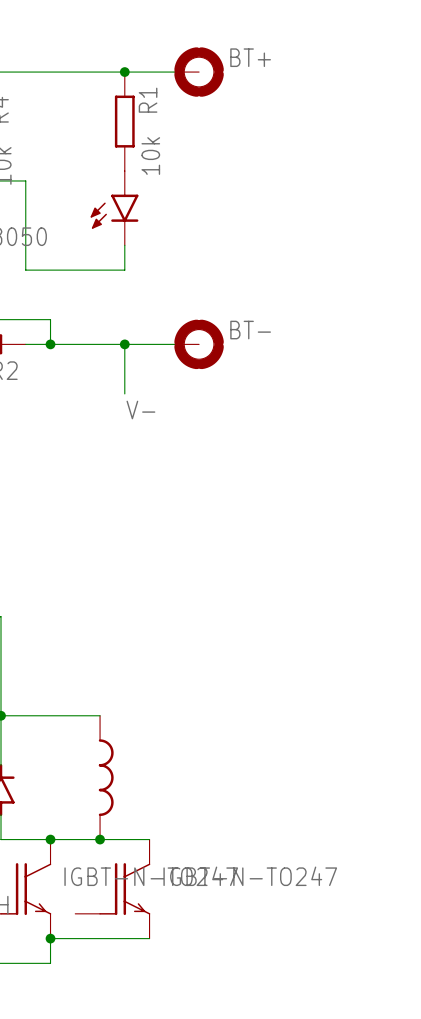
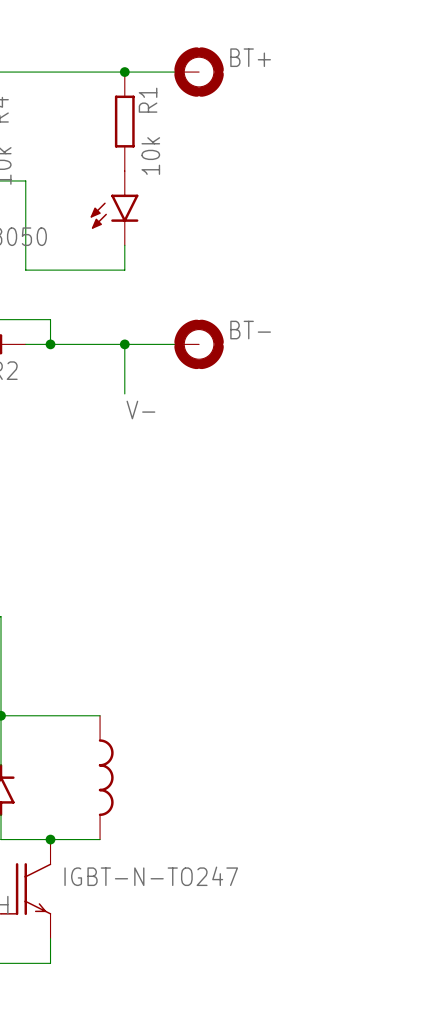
wire: (100, 839) (149, 839) -> none
junction: (100, 839) -> none
part: IGBT-N-TO247 (112, 889) -> none
wire: (50, 938) (149, 938) -> none
junction: (50, 938) -> none

